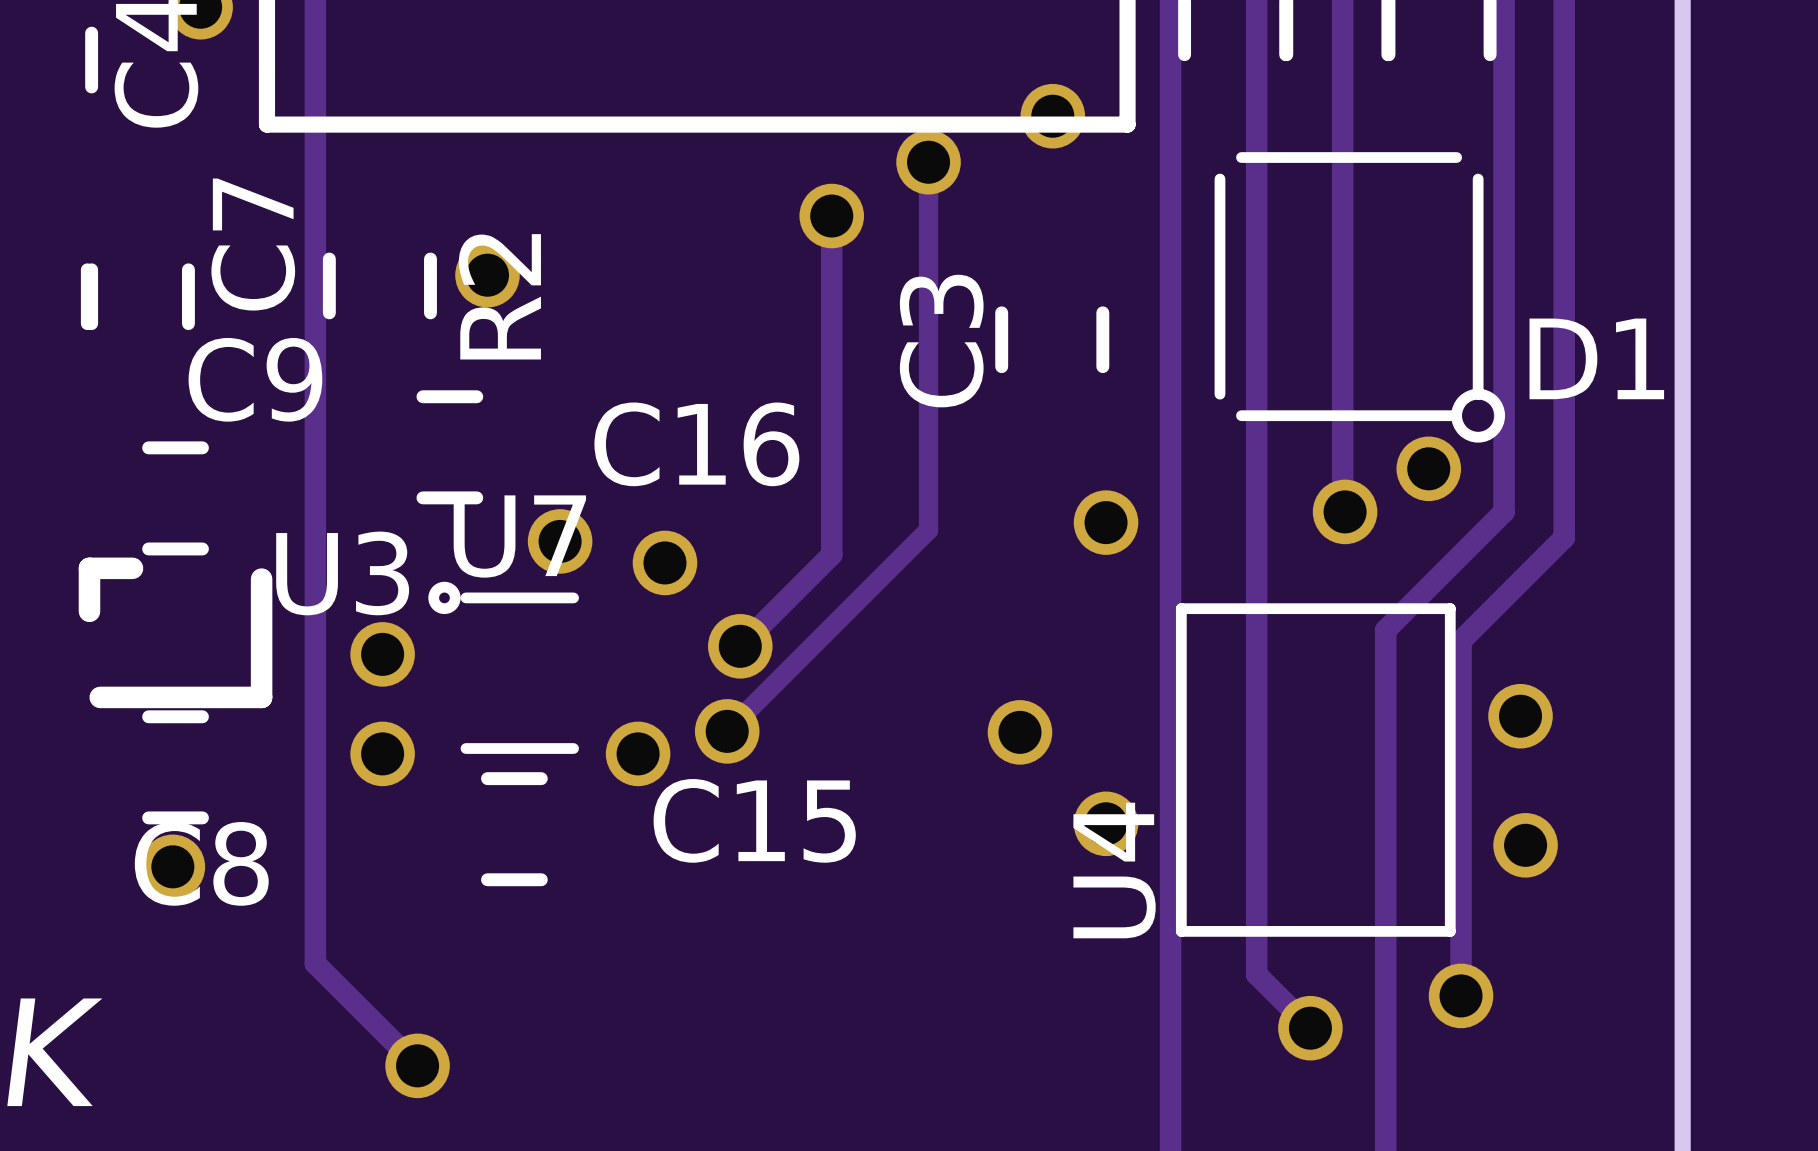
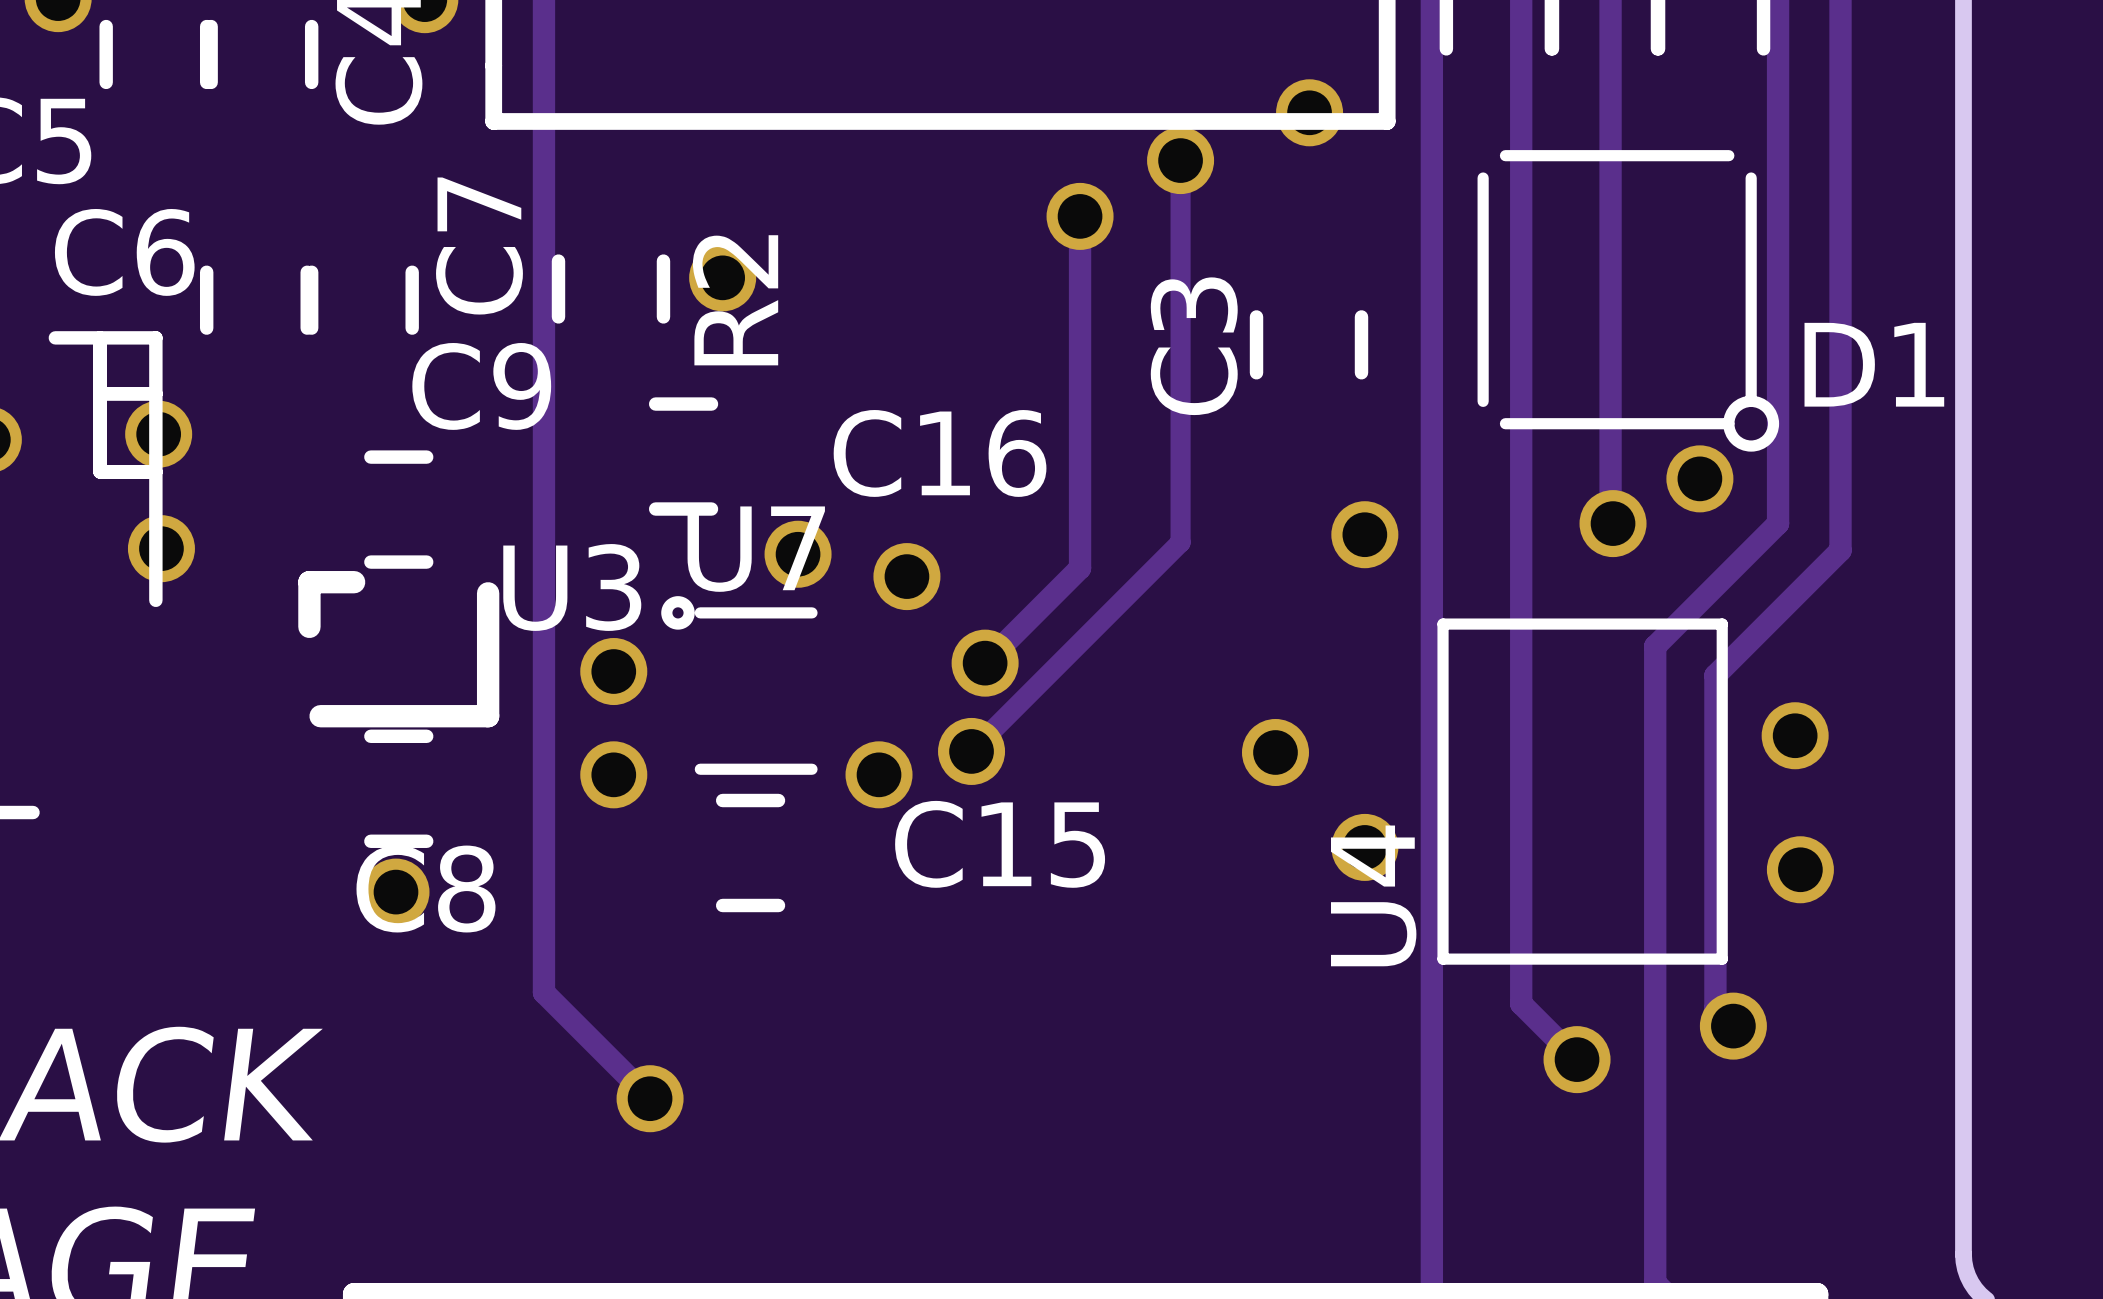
track: (1461, 640) (1461, 995) -> (1733, 657) (1715, 675) (1715, 1008) (1733, 1026)

